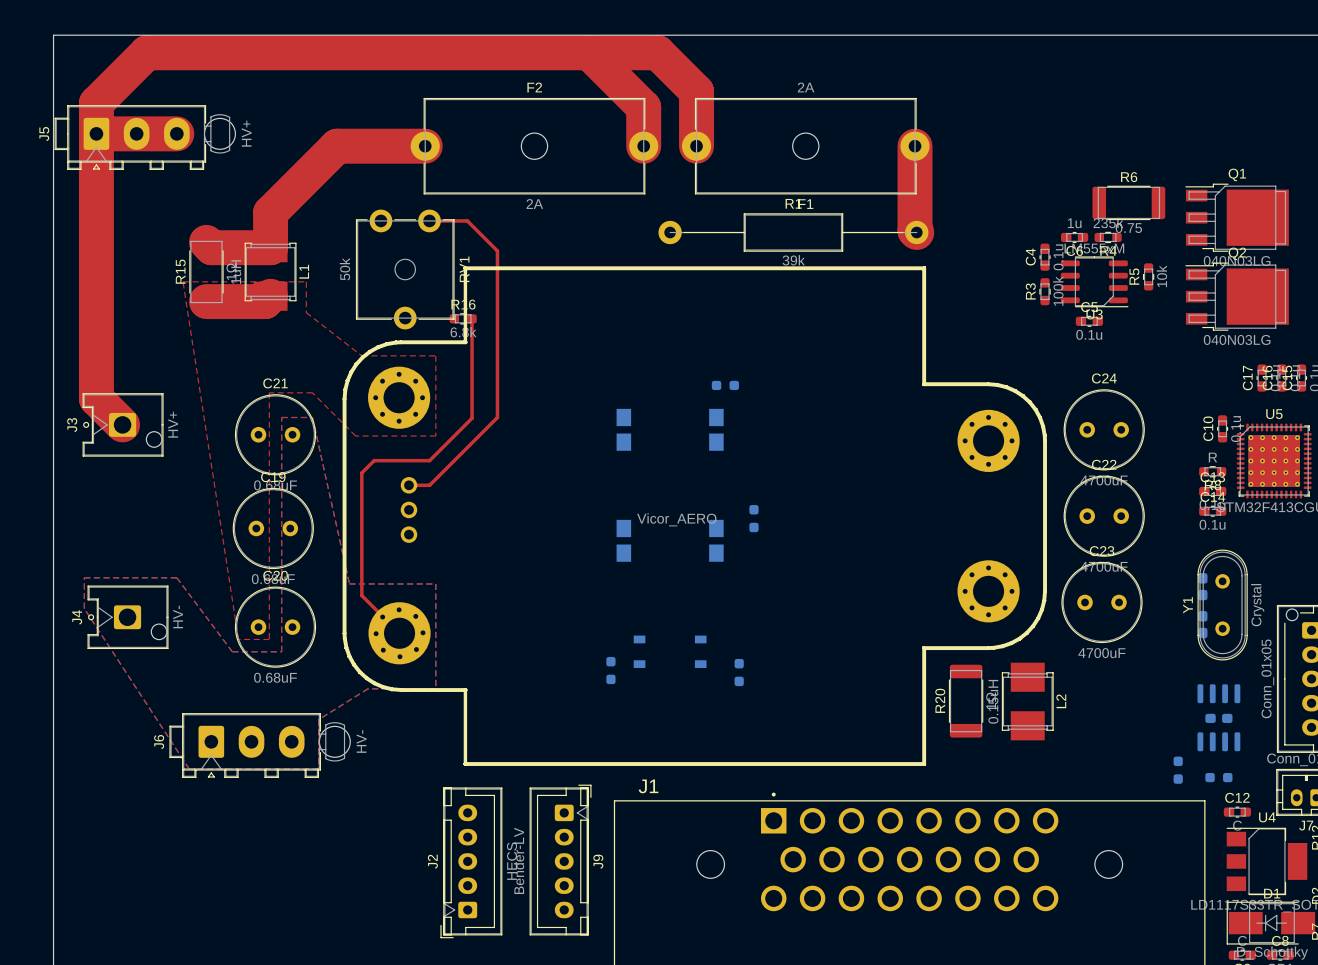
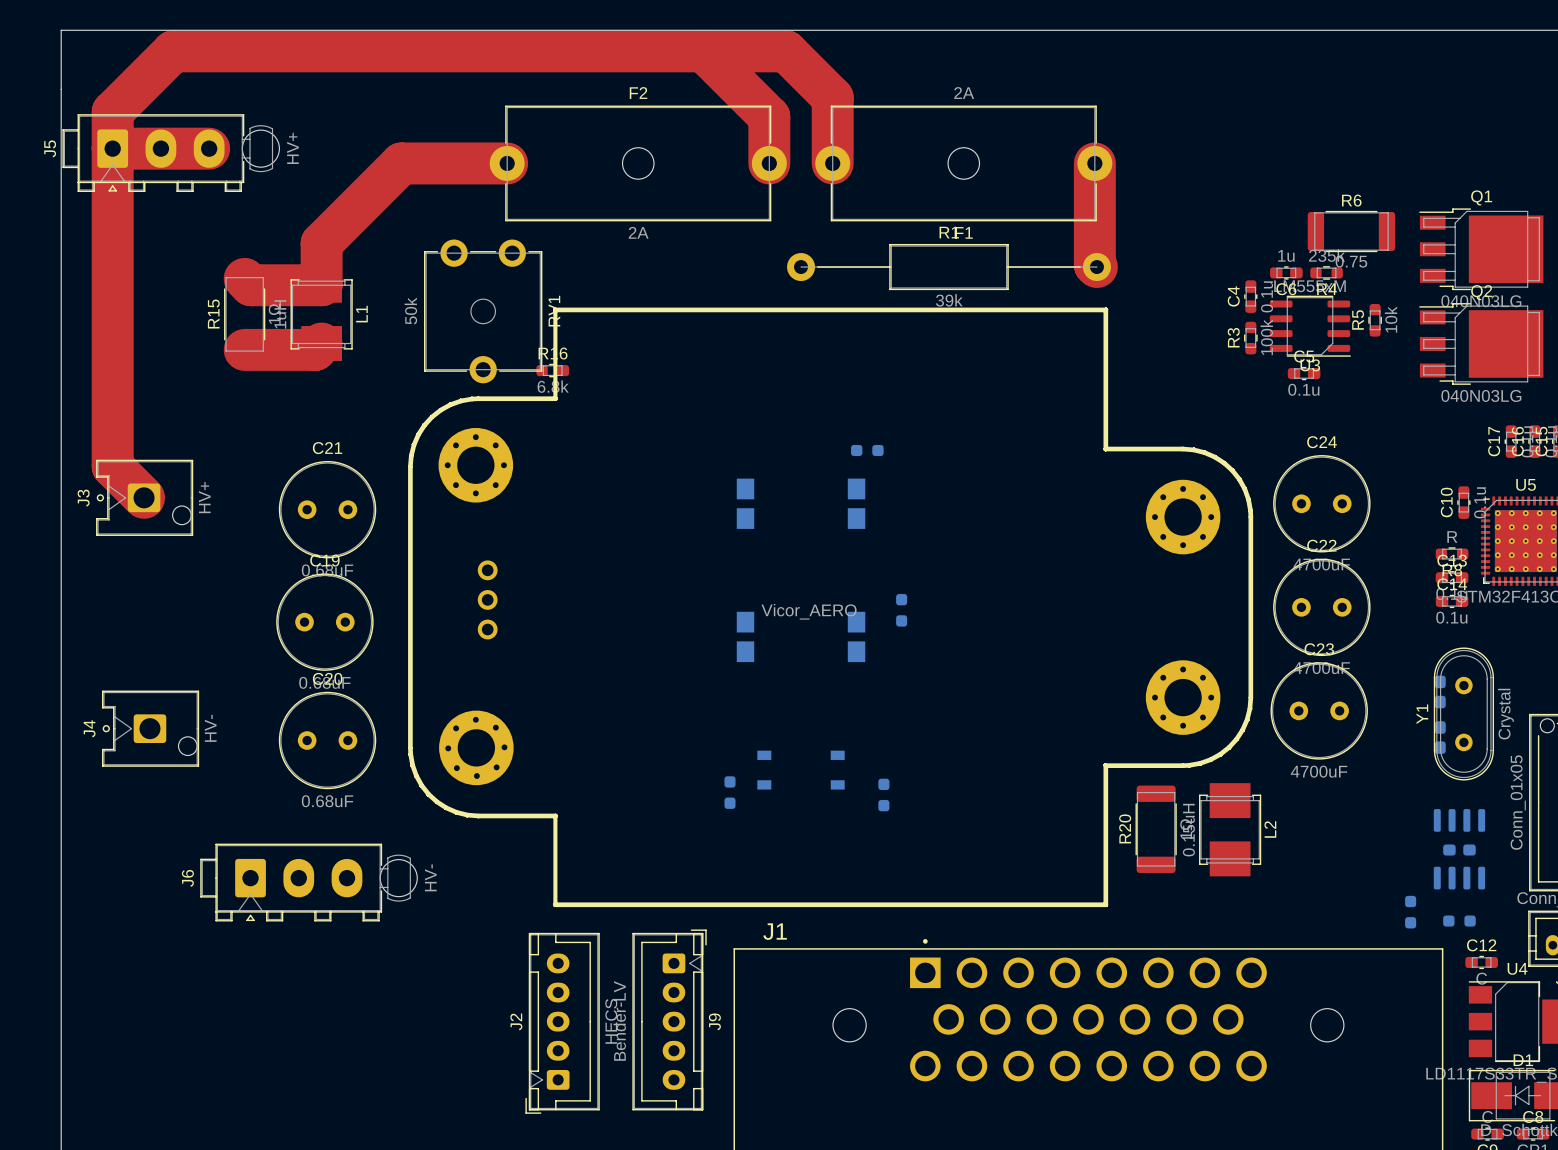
top track: (429, 220) (467, 220) (497, 251) (497, 417) (429, 485) -> none
top zone outline: (183, 281) (238, 639) (269, 639) (269, 392) (312, 392) (355, 435) (435, 435) (435, 355) (361, 355) (306, 312) (306, 281) (183, 281) -> none
top track: (472, 318) (472, 418) (429, 460) (374, 460) (361, 472) (361, 595) (399, 633) -> none
top zone outline: (281, 417) (281, 651) (232, 651) (176, 577) (84, 577) (84, 608) (189, 768) (318, 768) (318, 719) (367, 688) (435, 688) (435, 583) (349, 583) (312, 417) (281, 417) -> none
top track: (408, 485) (429, 485) -> none

